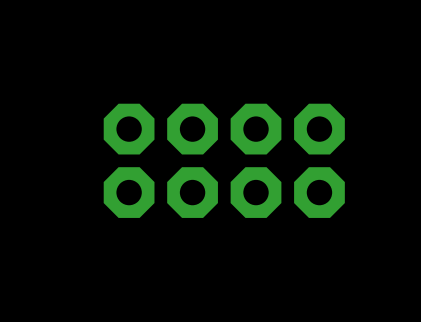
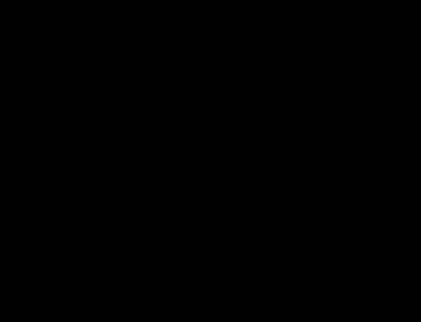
part: (224, 160) -> none

